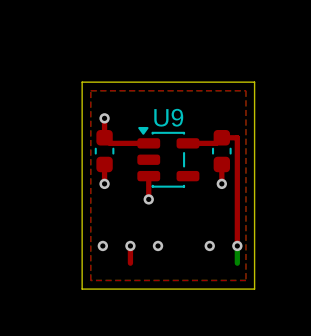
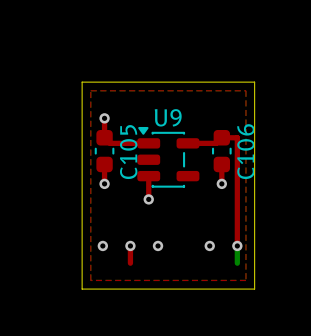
C105 name: none -> C105 (128, 152)
C106 name: none -> C106 (245, 151)

